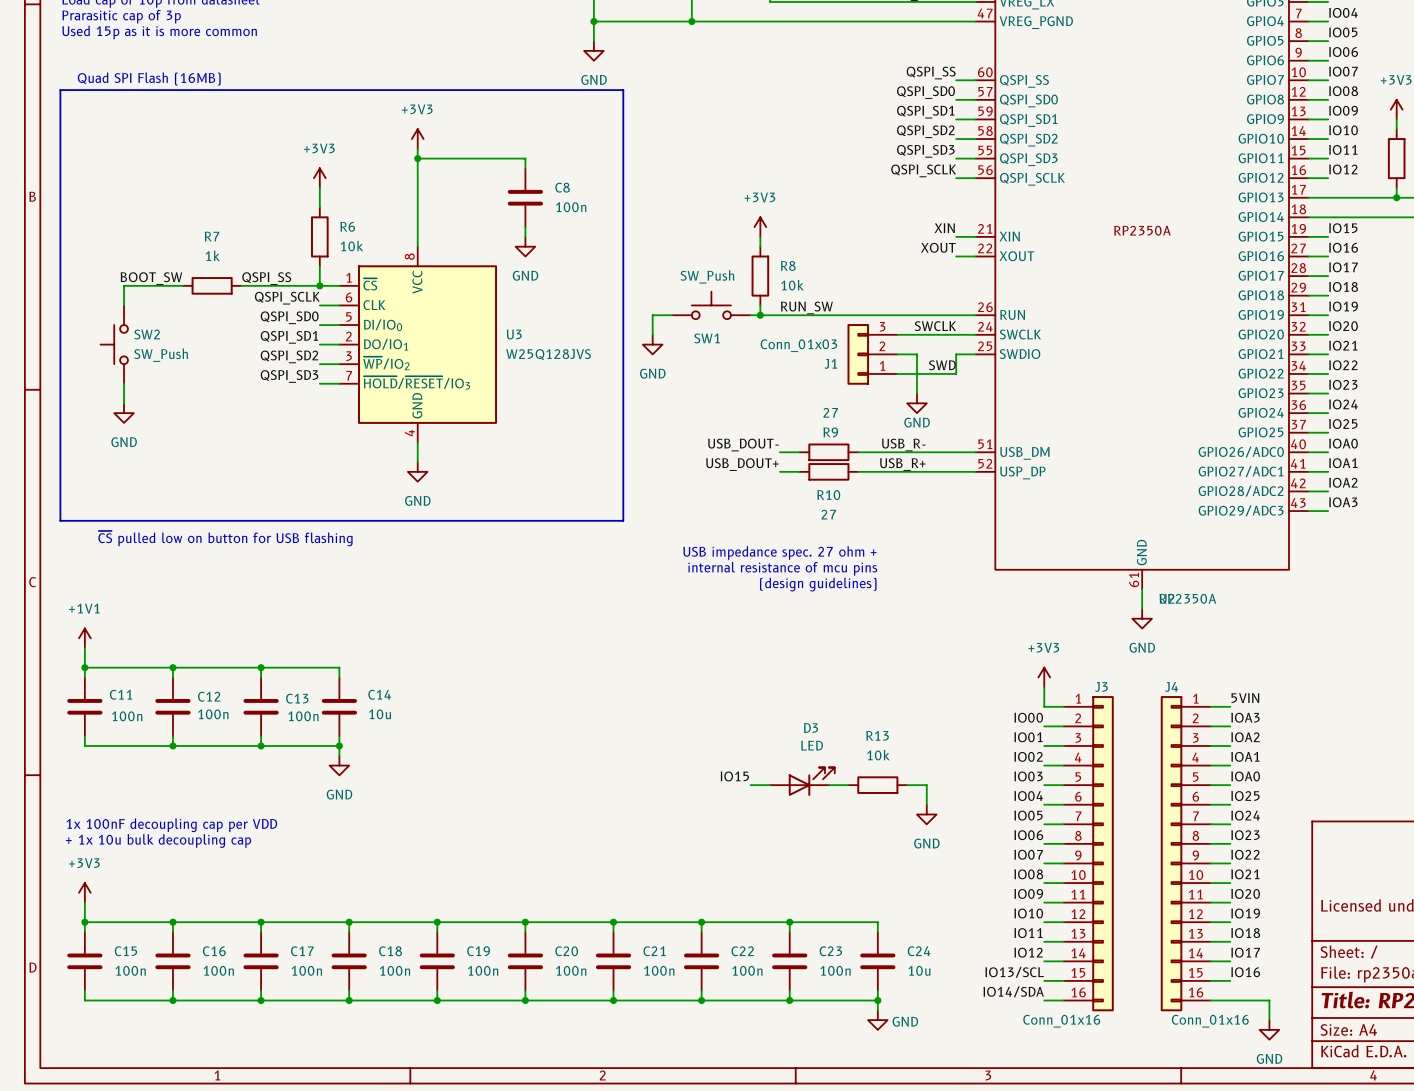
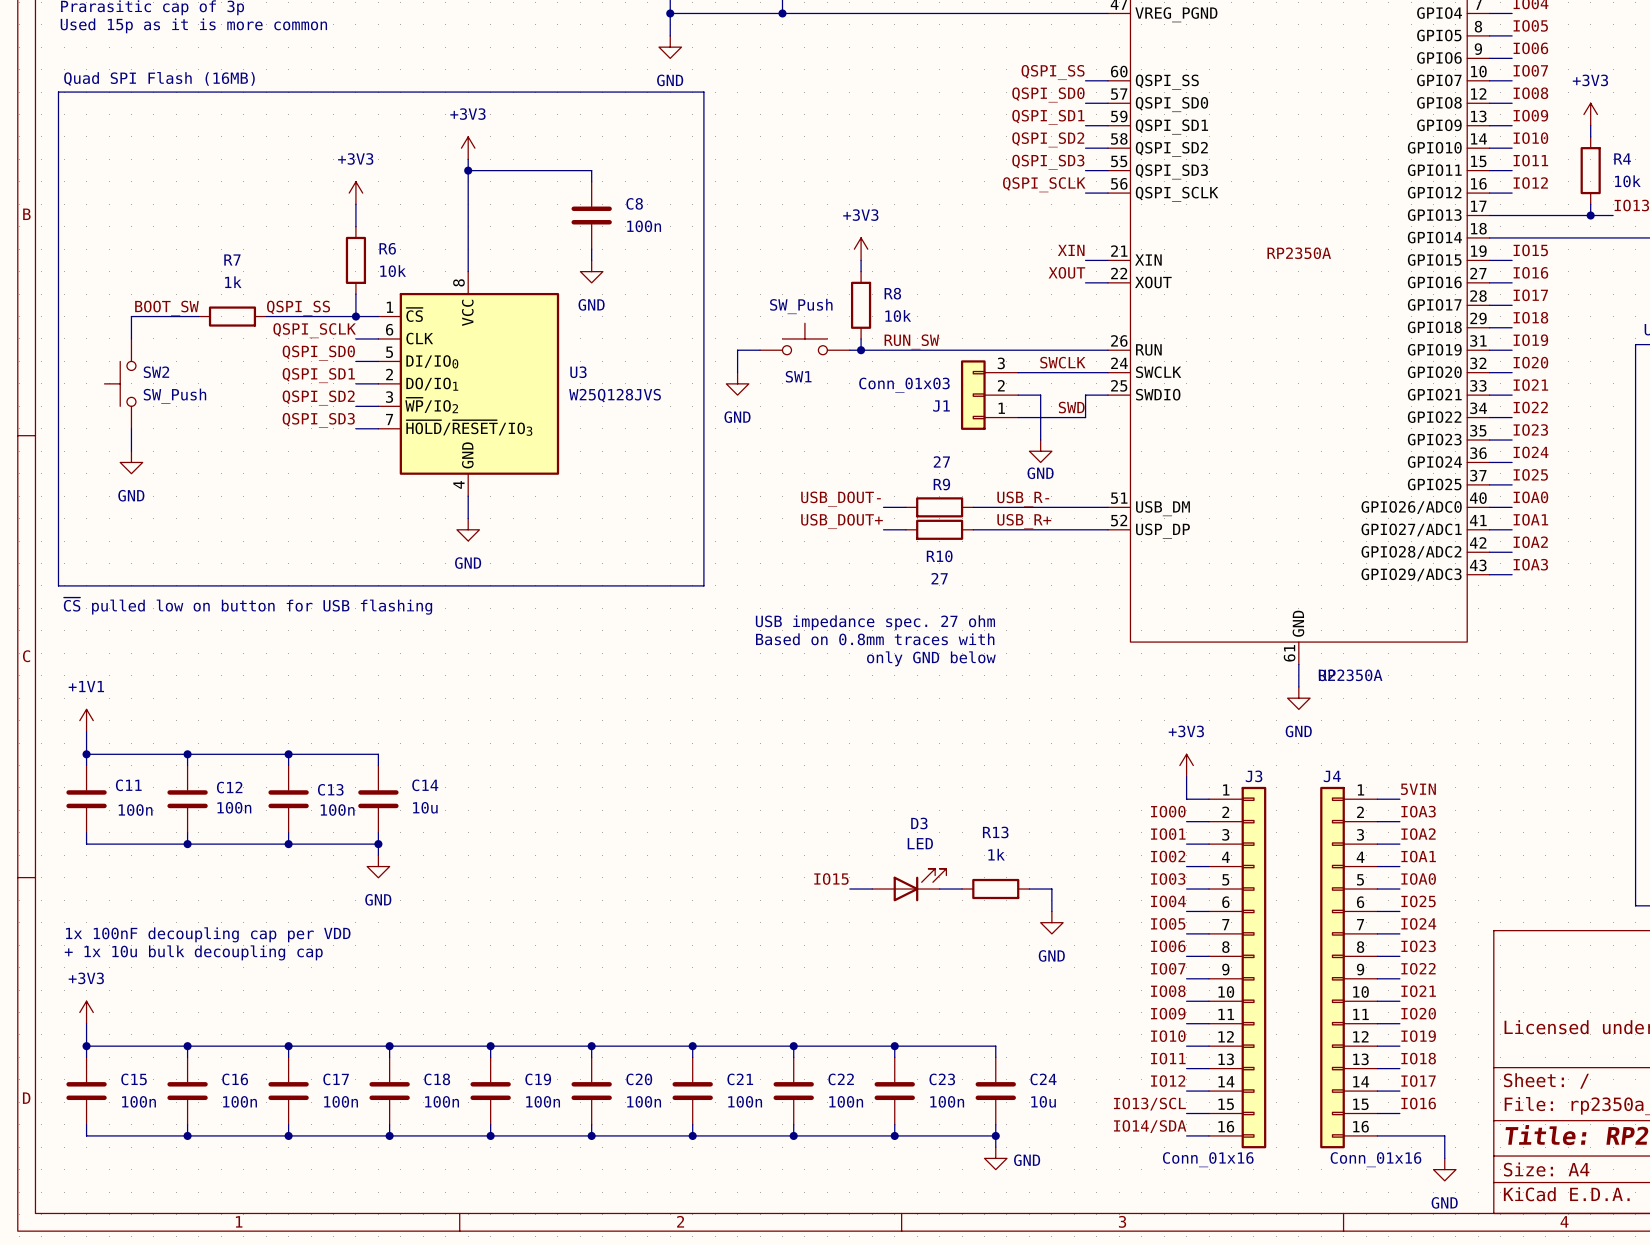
text: USB impedance spec. 27 ohm + (779, 553) -> USB impedance spec. 27 ohm (875, 622)
text: internal resistance of mcu pins (782, 568) -> Based on 0.8mm traces with (875, 639)
text: (design guidelines) (818, 584) -> only GND below (931, 658)
R13 value: 10k (878, 755) -> 1k (996, 854)

